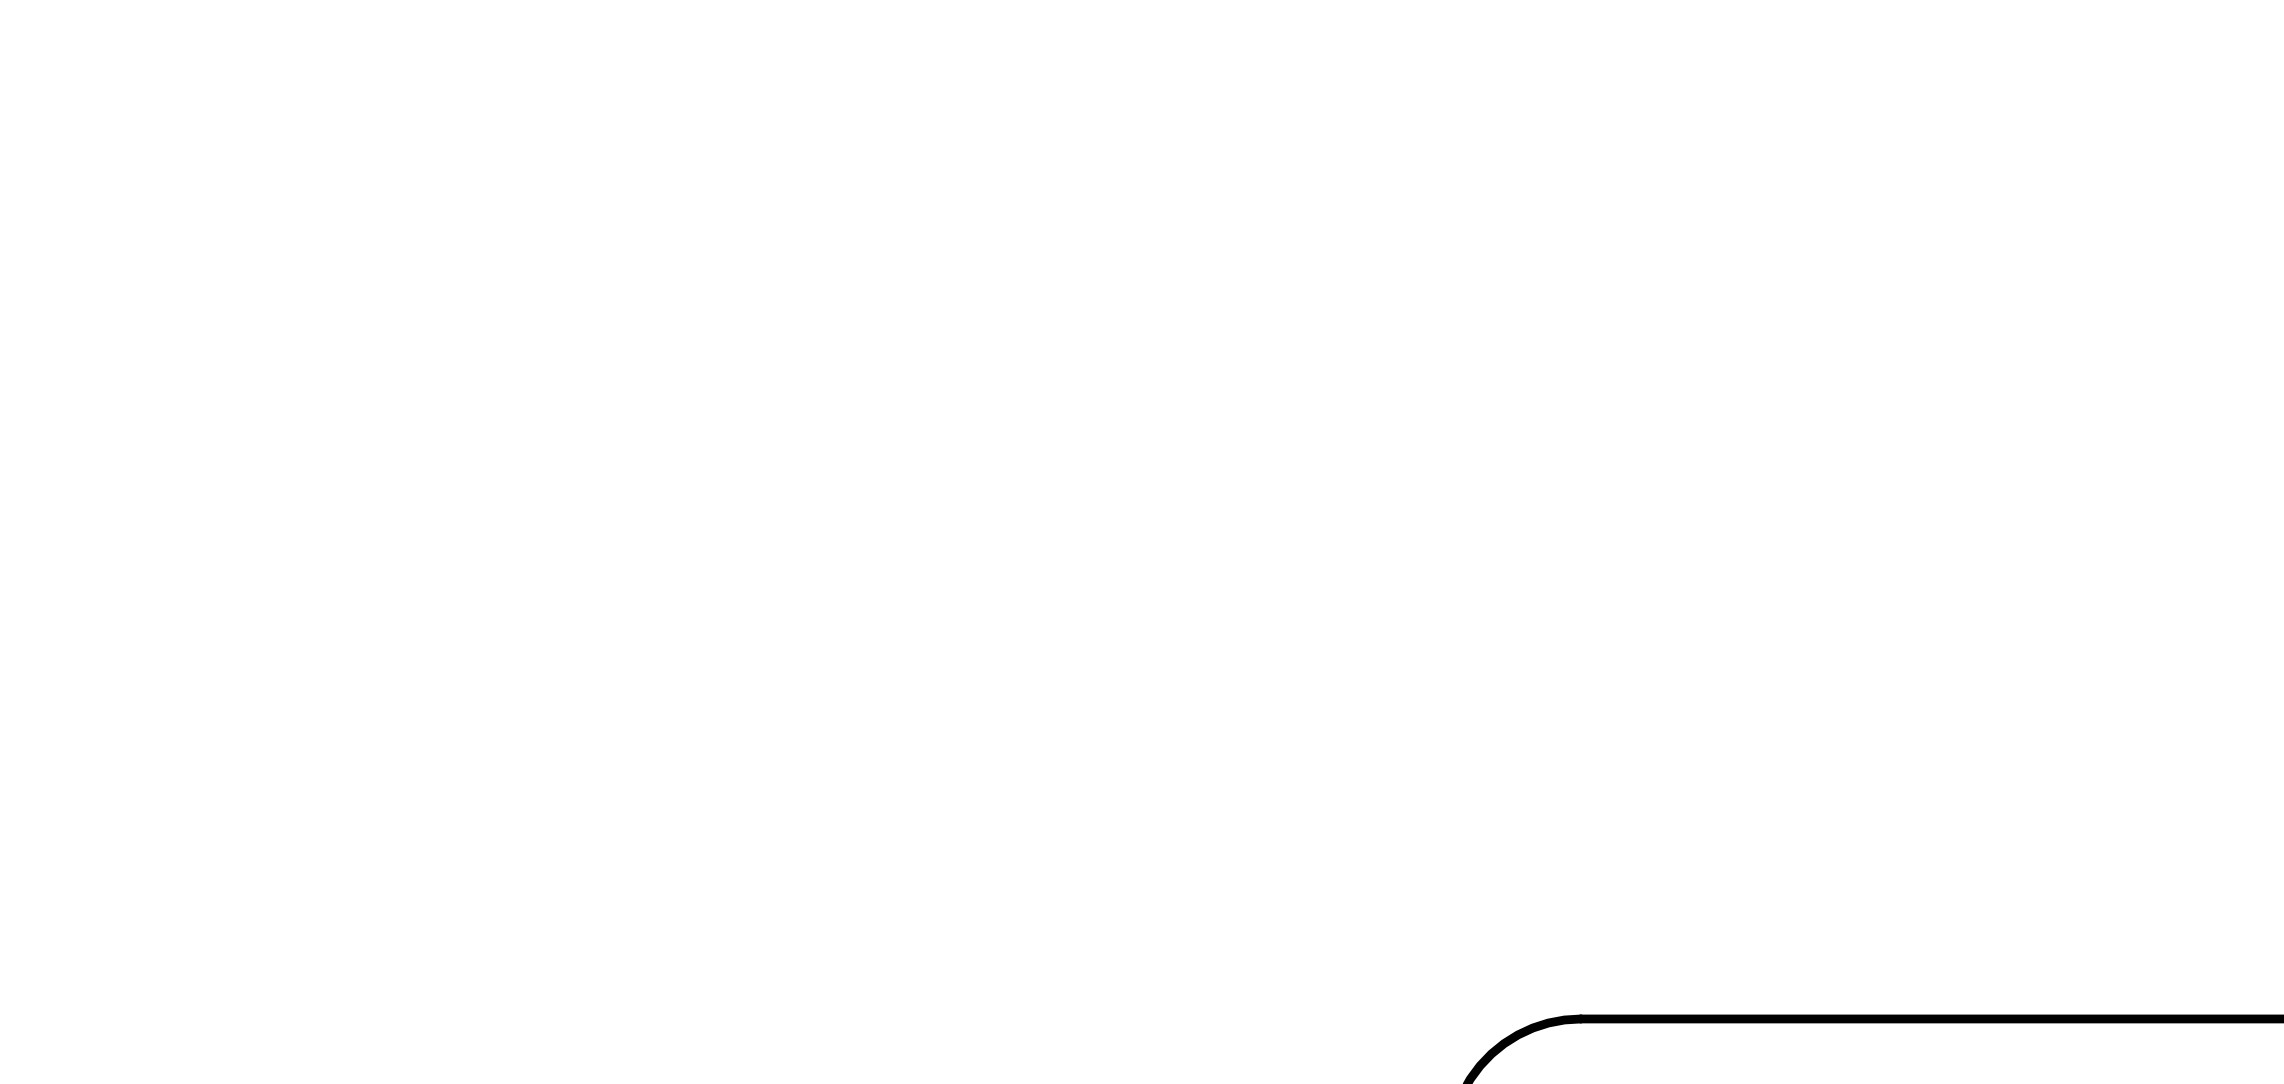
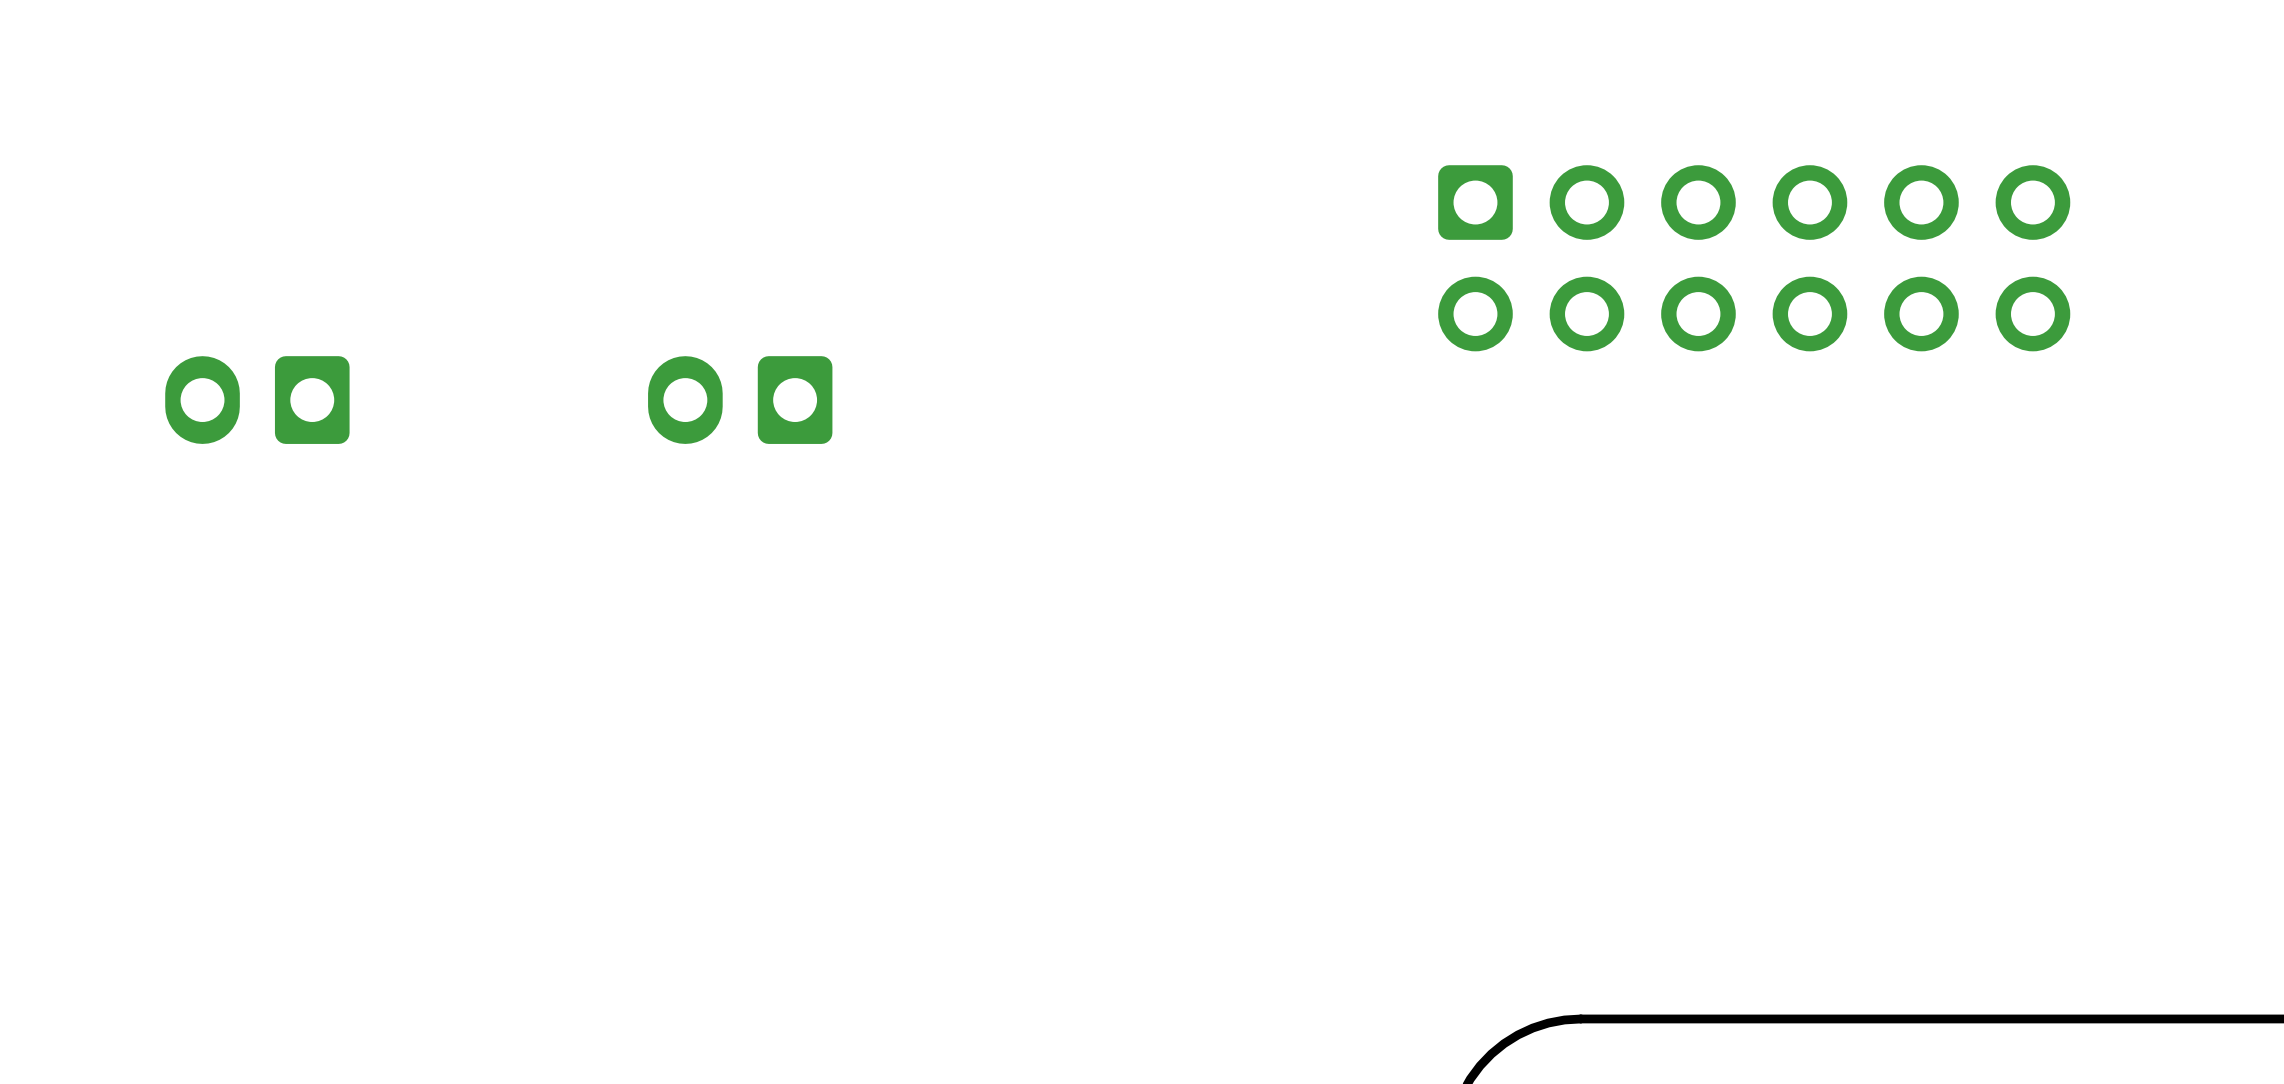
part: none -> (1754, 258)
part: none -> (257, 400)
part: none -> (740, 400)

